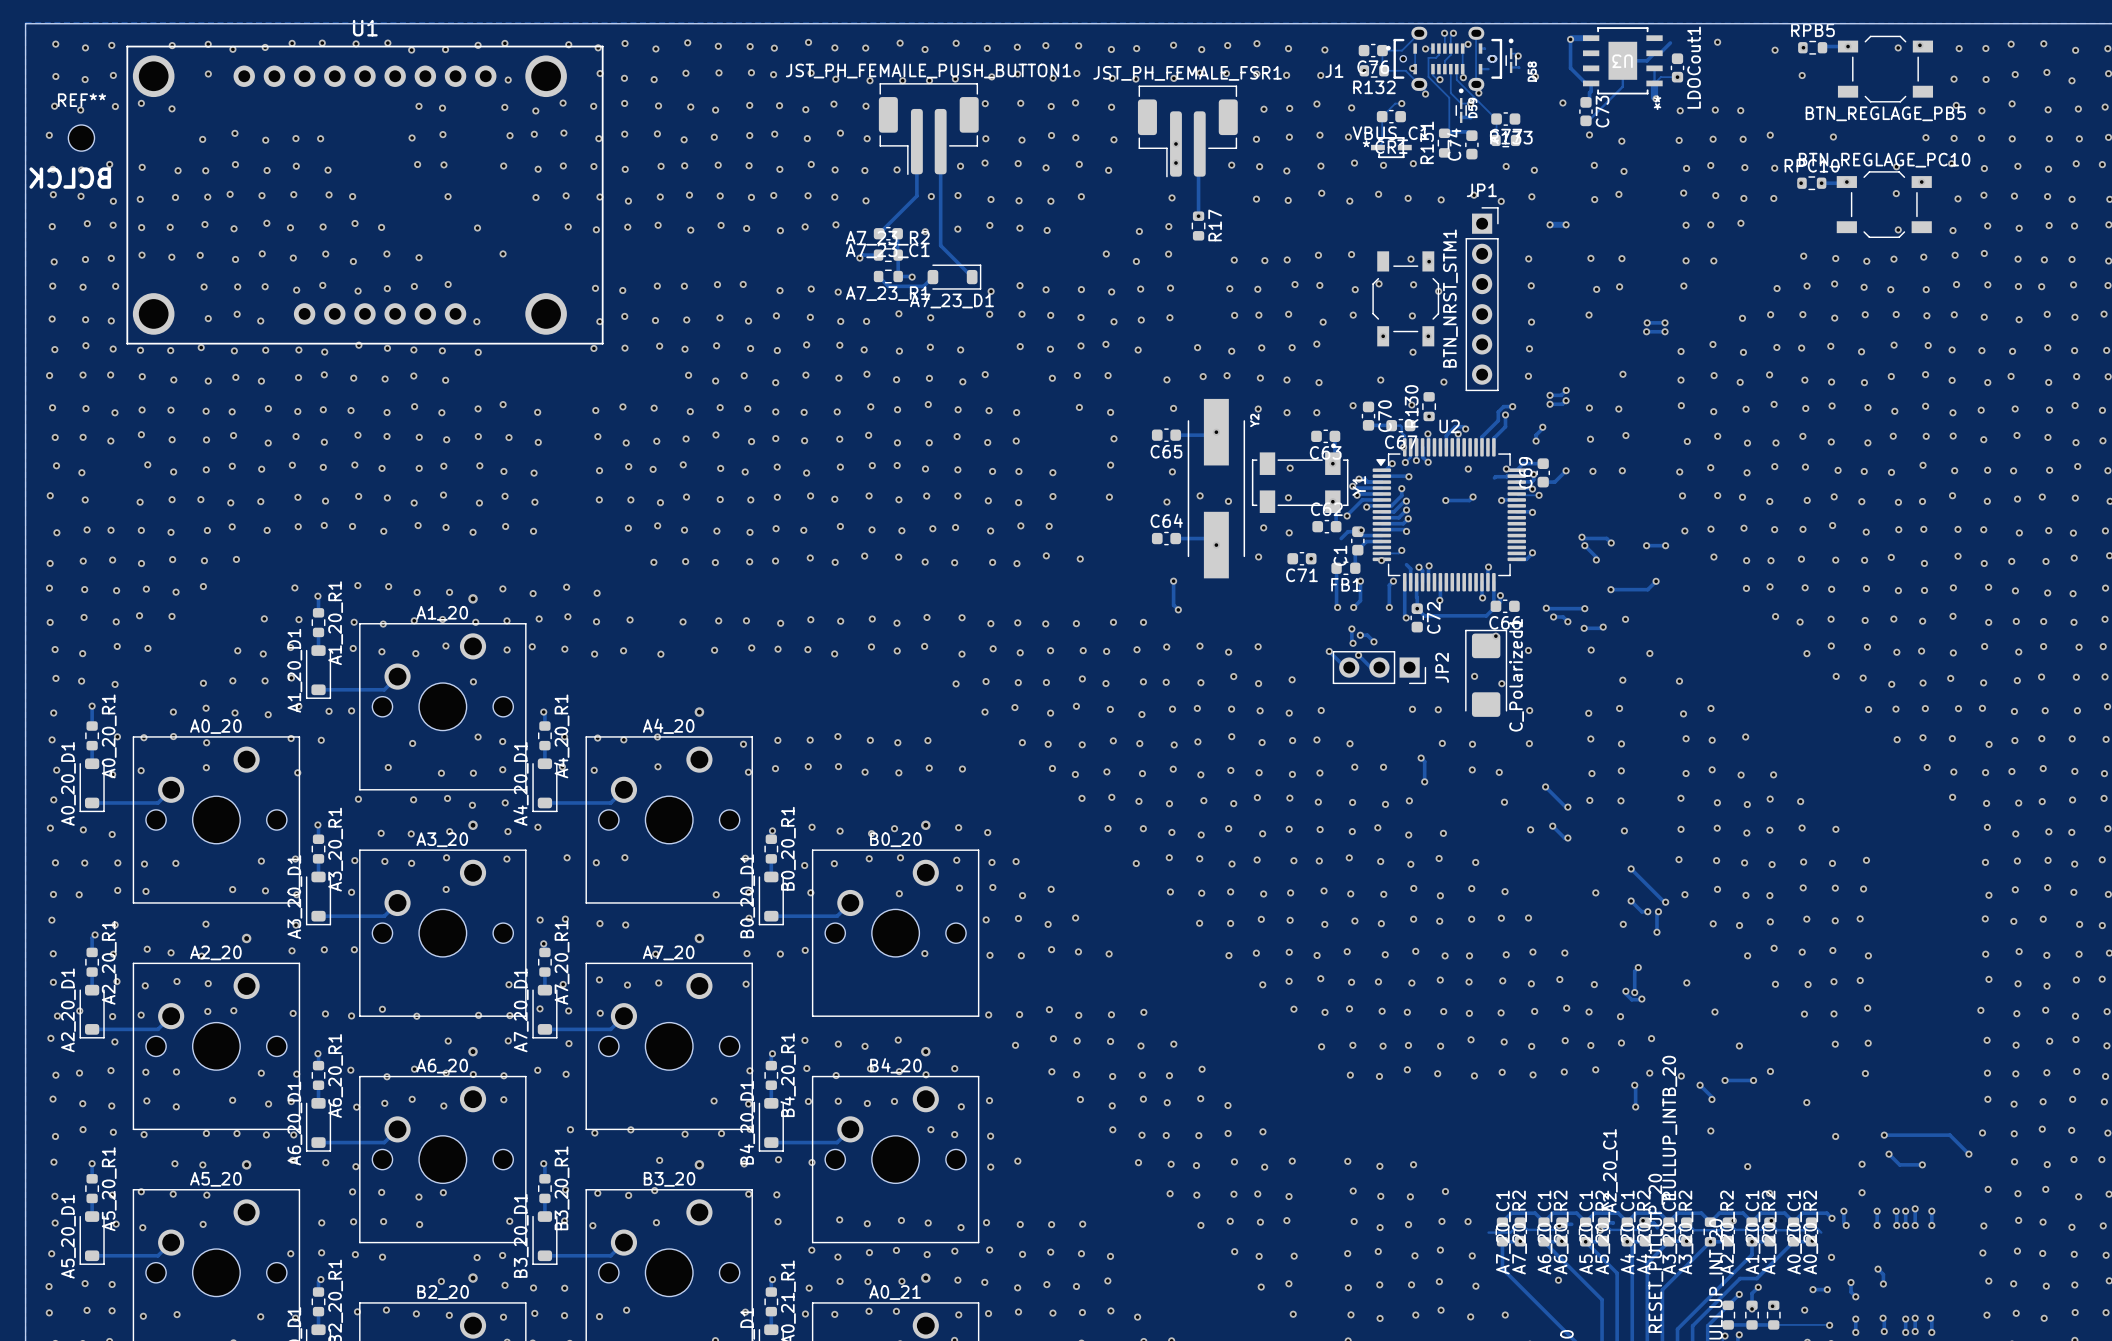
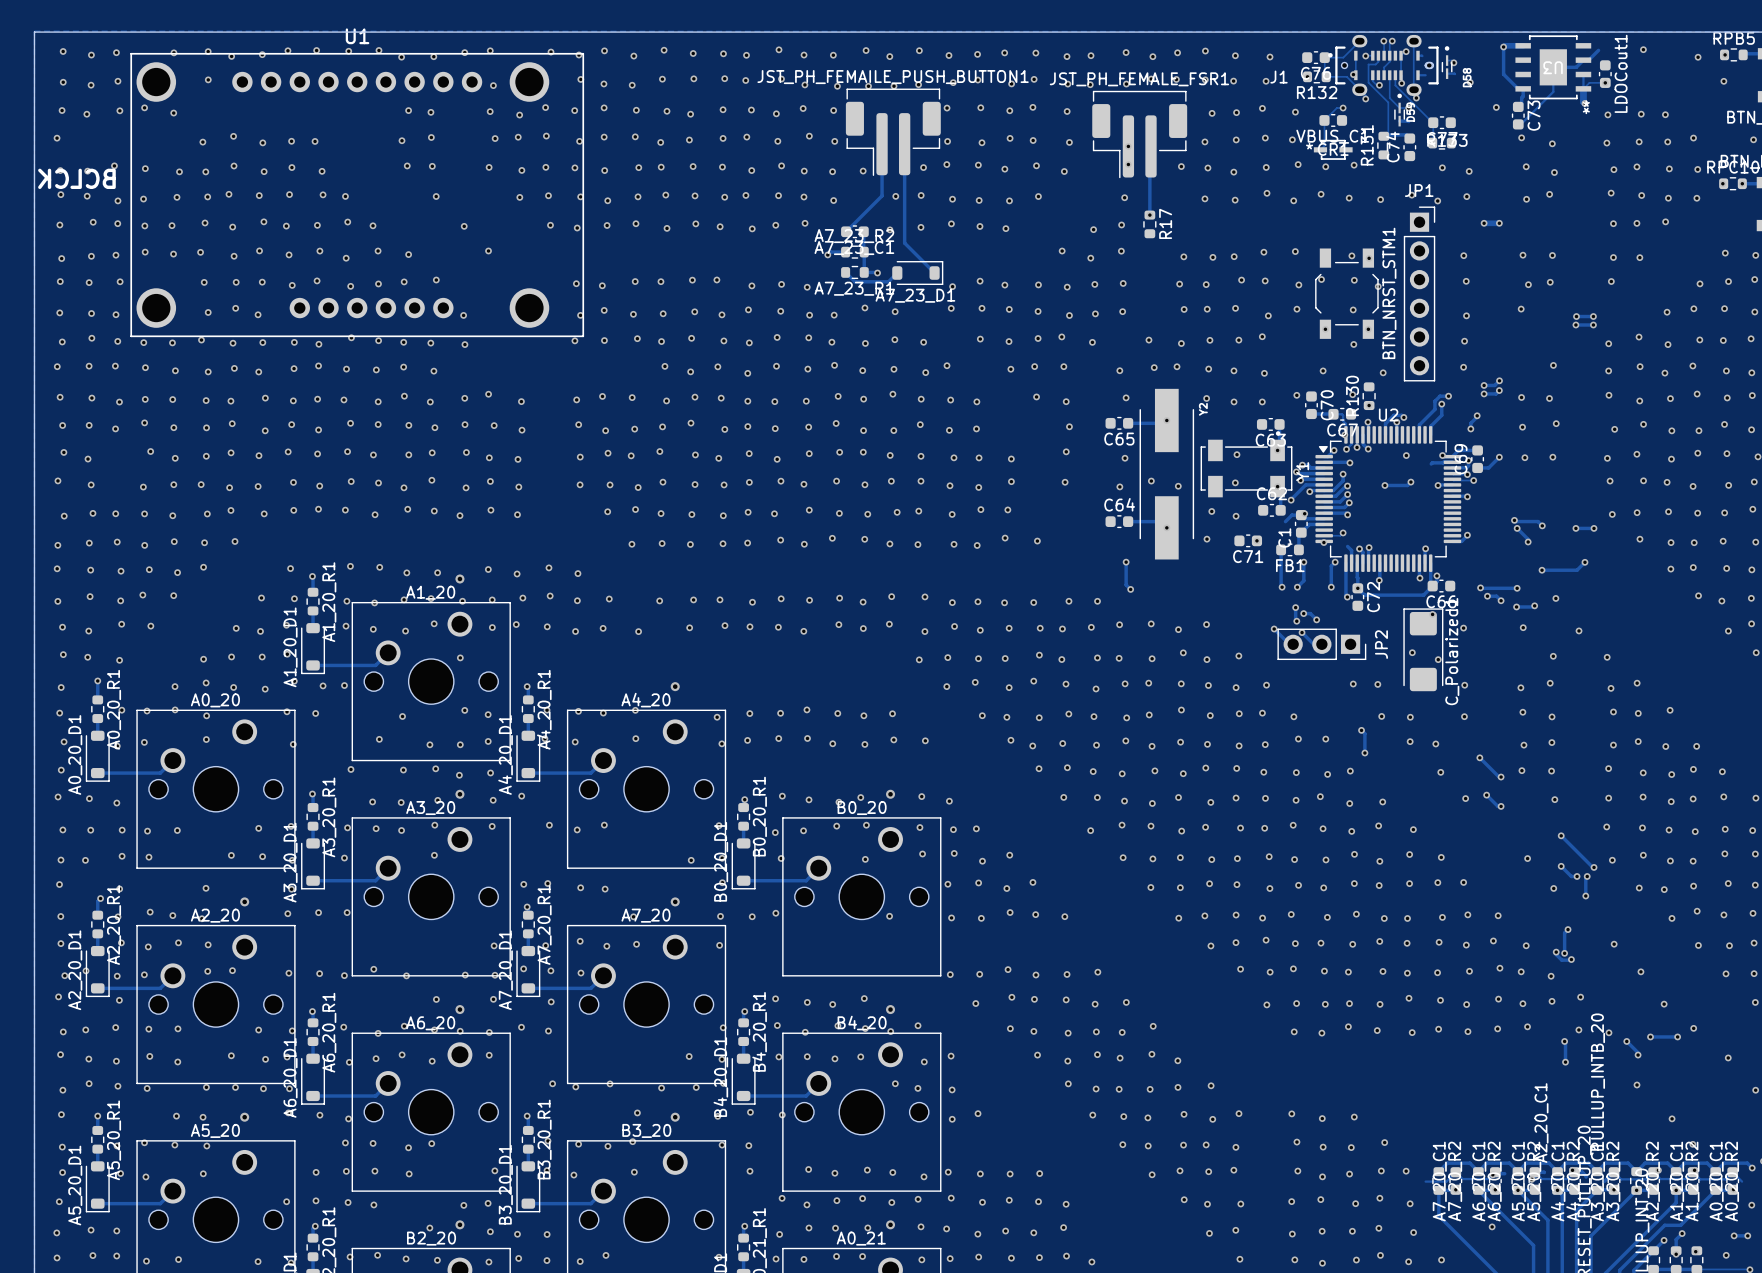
REF**: (81, 138) -> none

